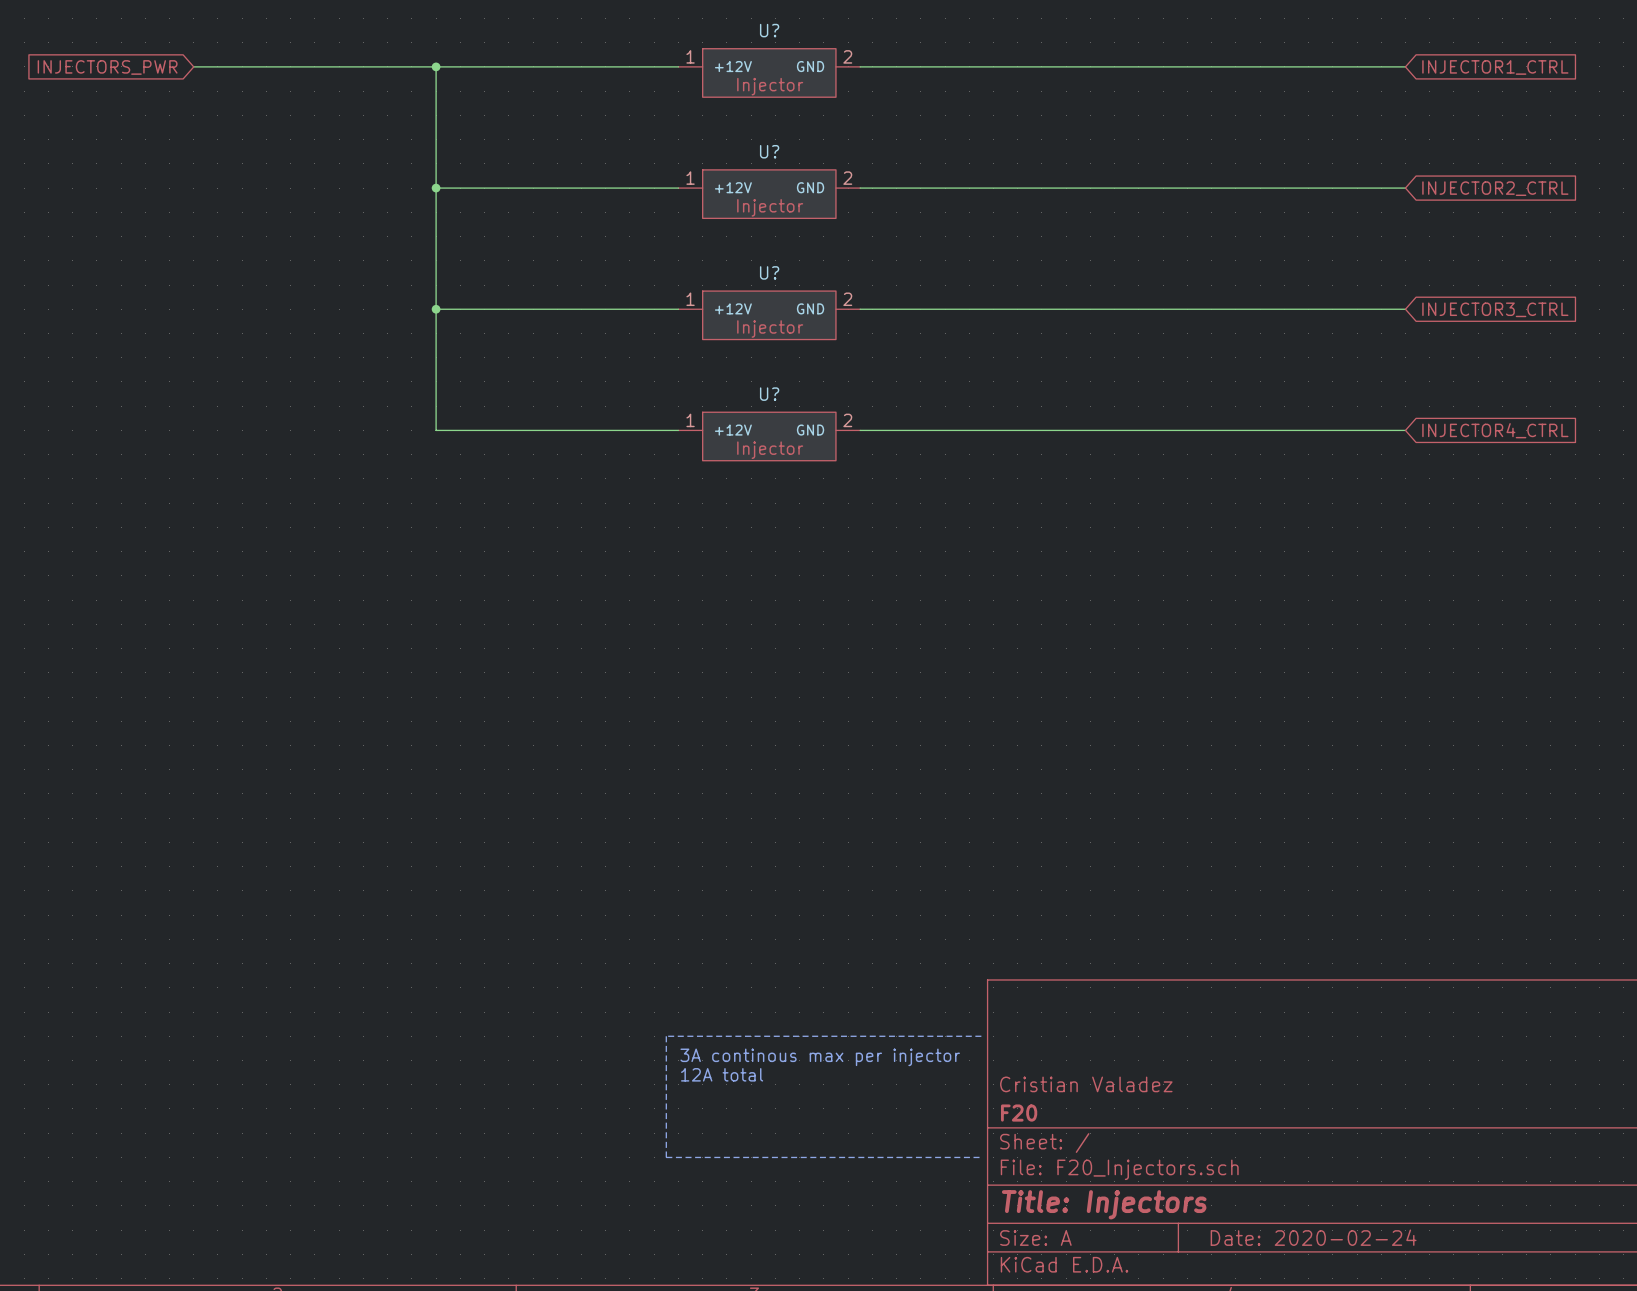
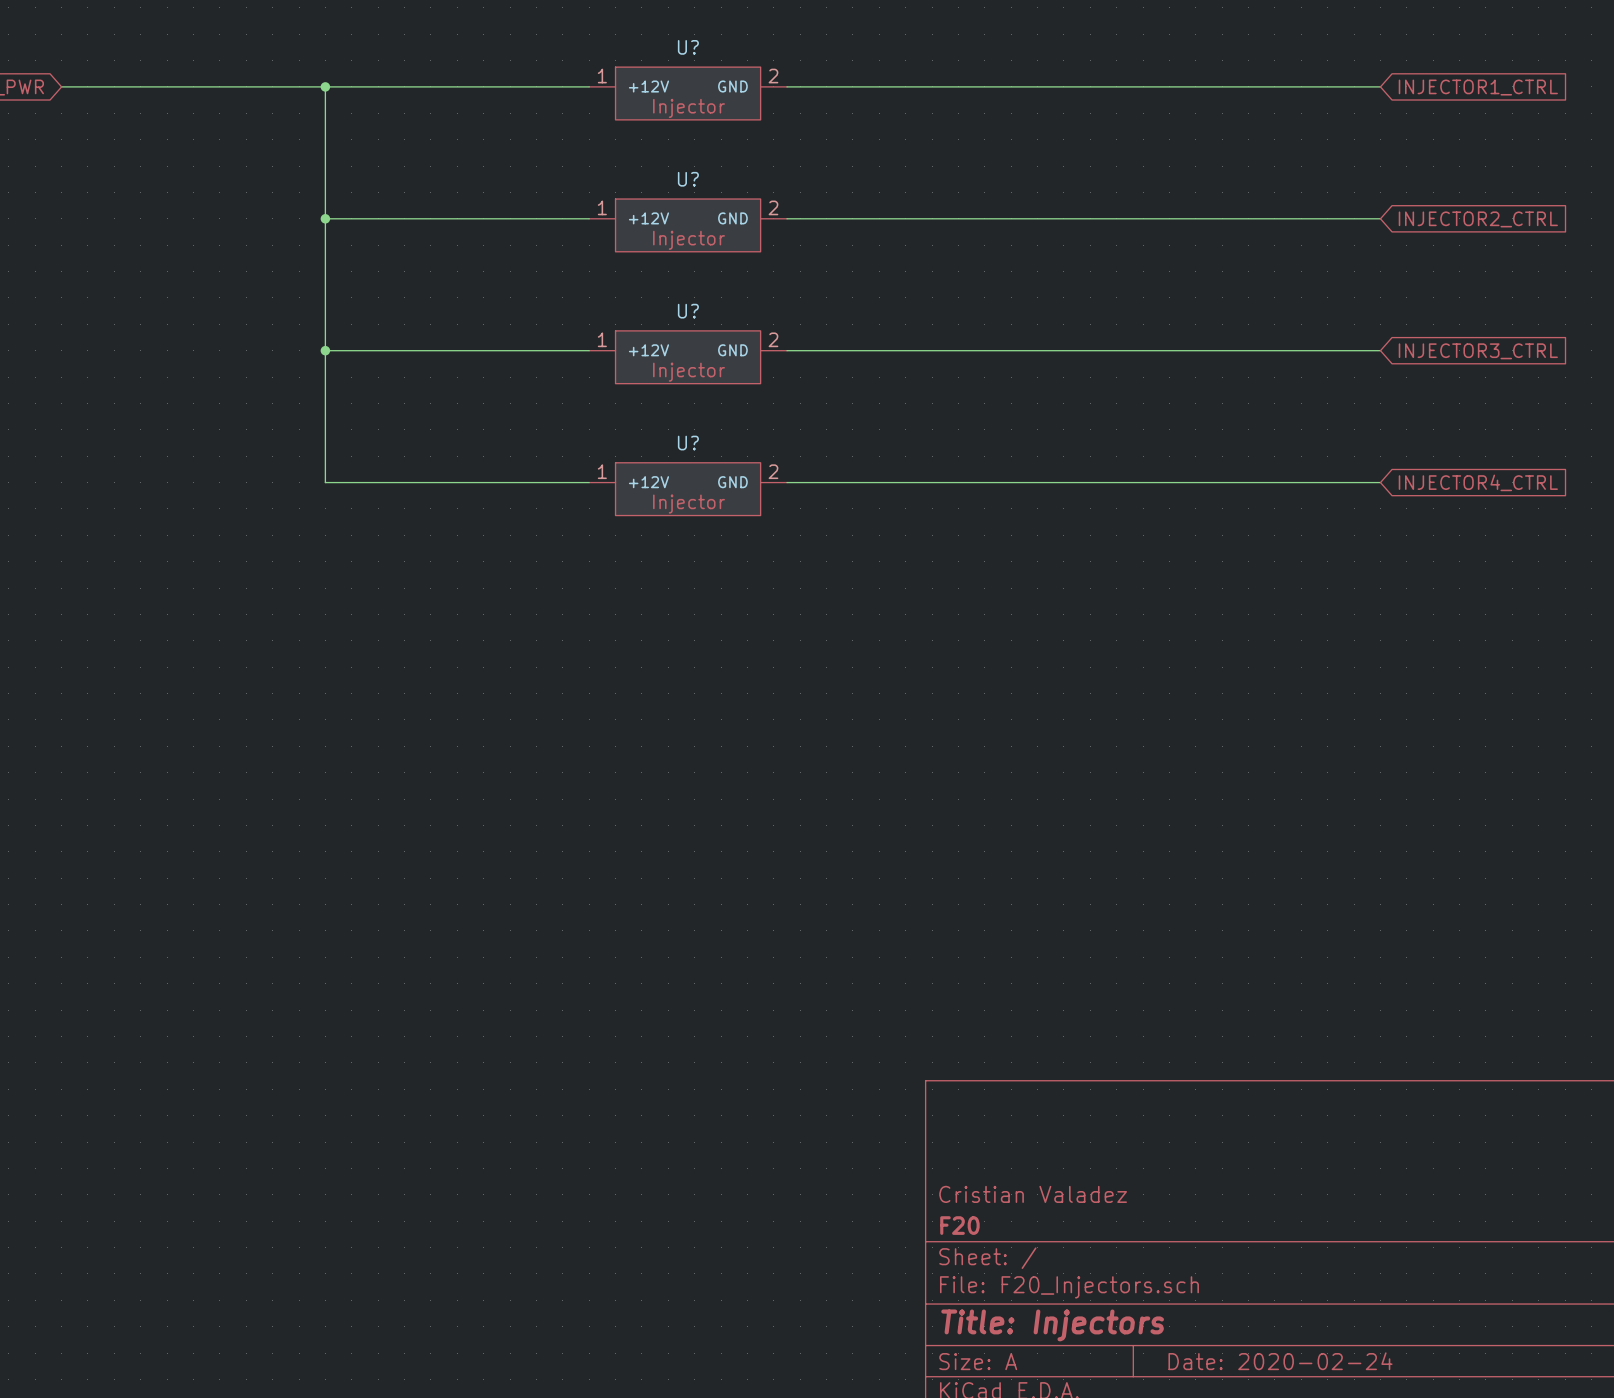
line: (981, 1036) (666, 1036) (666, 1157) (981, 1157) -> none
text: 3A continous max per injector (820, 1057) -> none
text: 12A total (722, 1074) -> none

